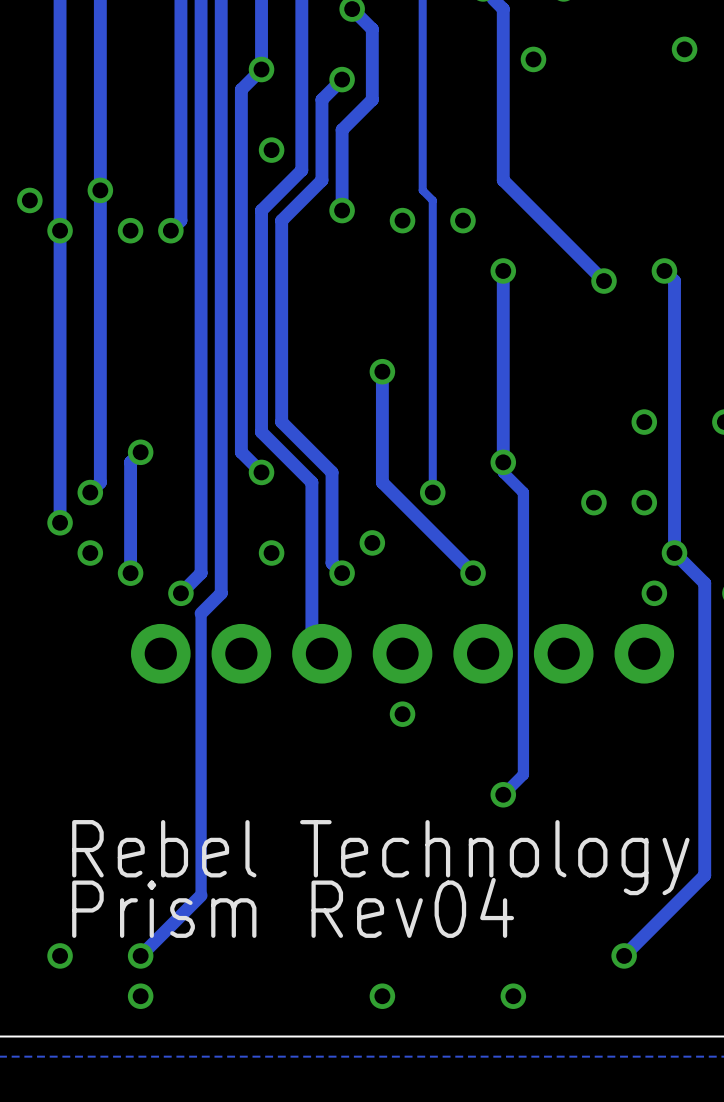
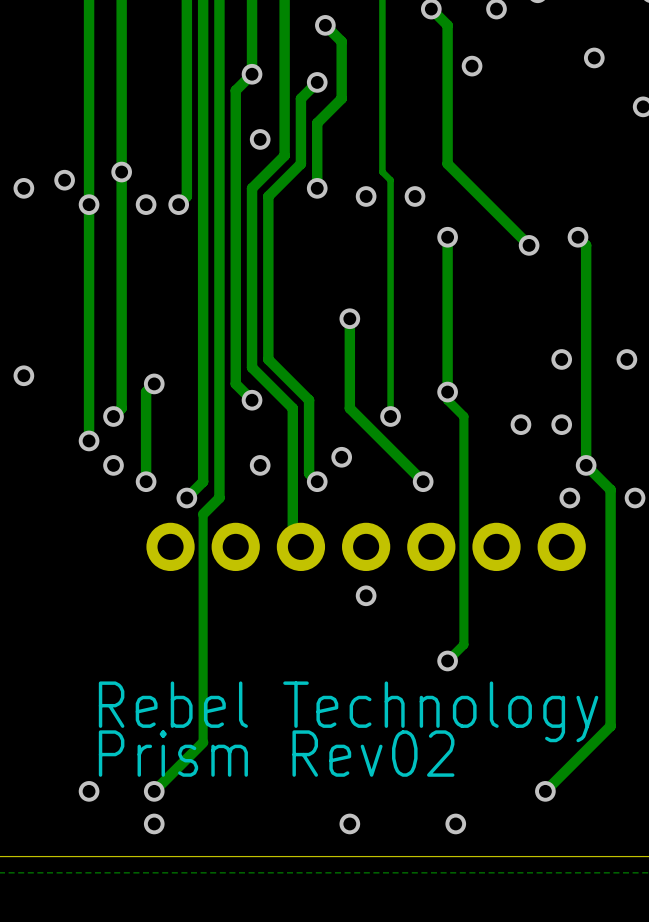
text: Prism Rev04 (293, 907) -> Prism Rev02 (276, 753)

